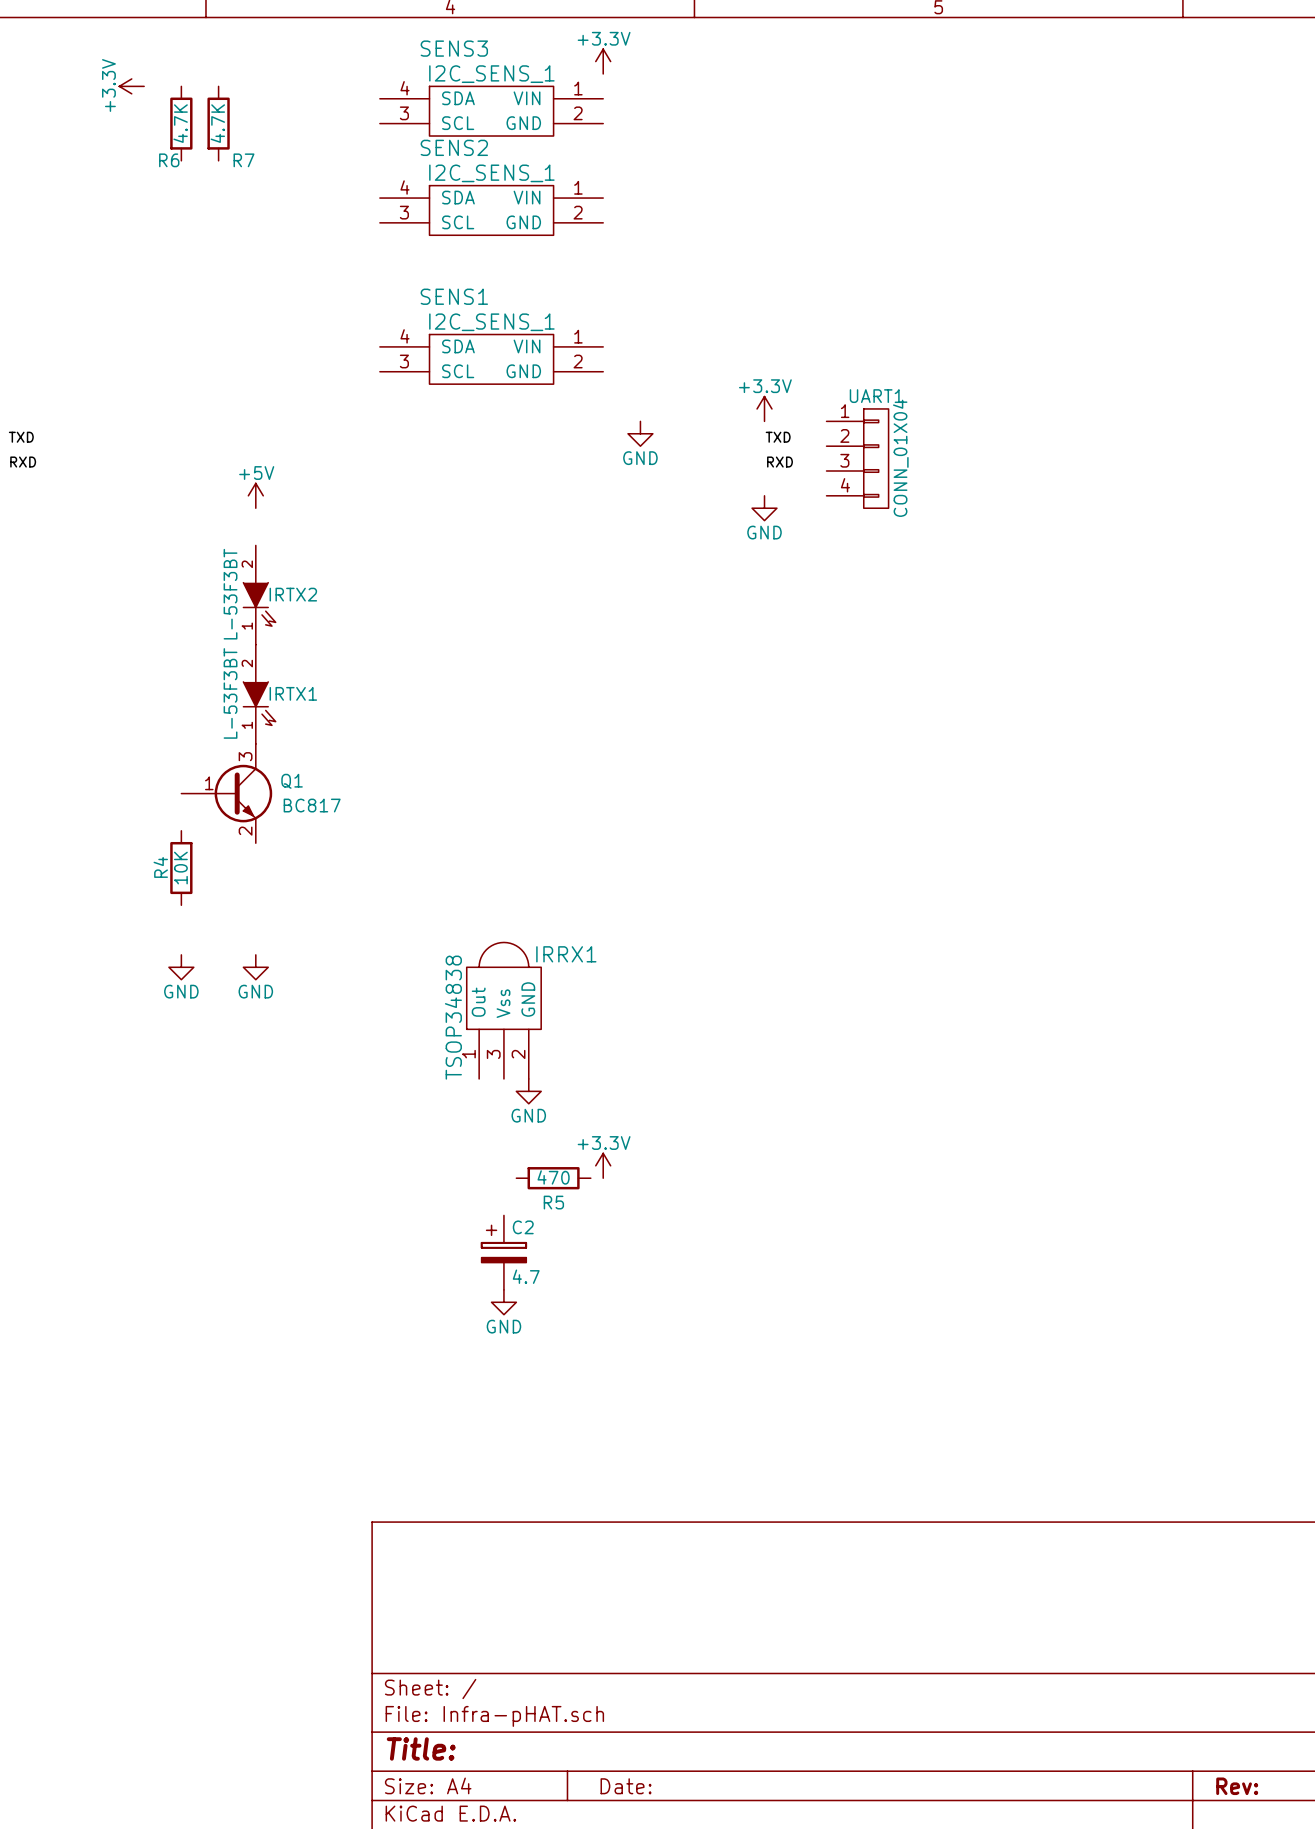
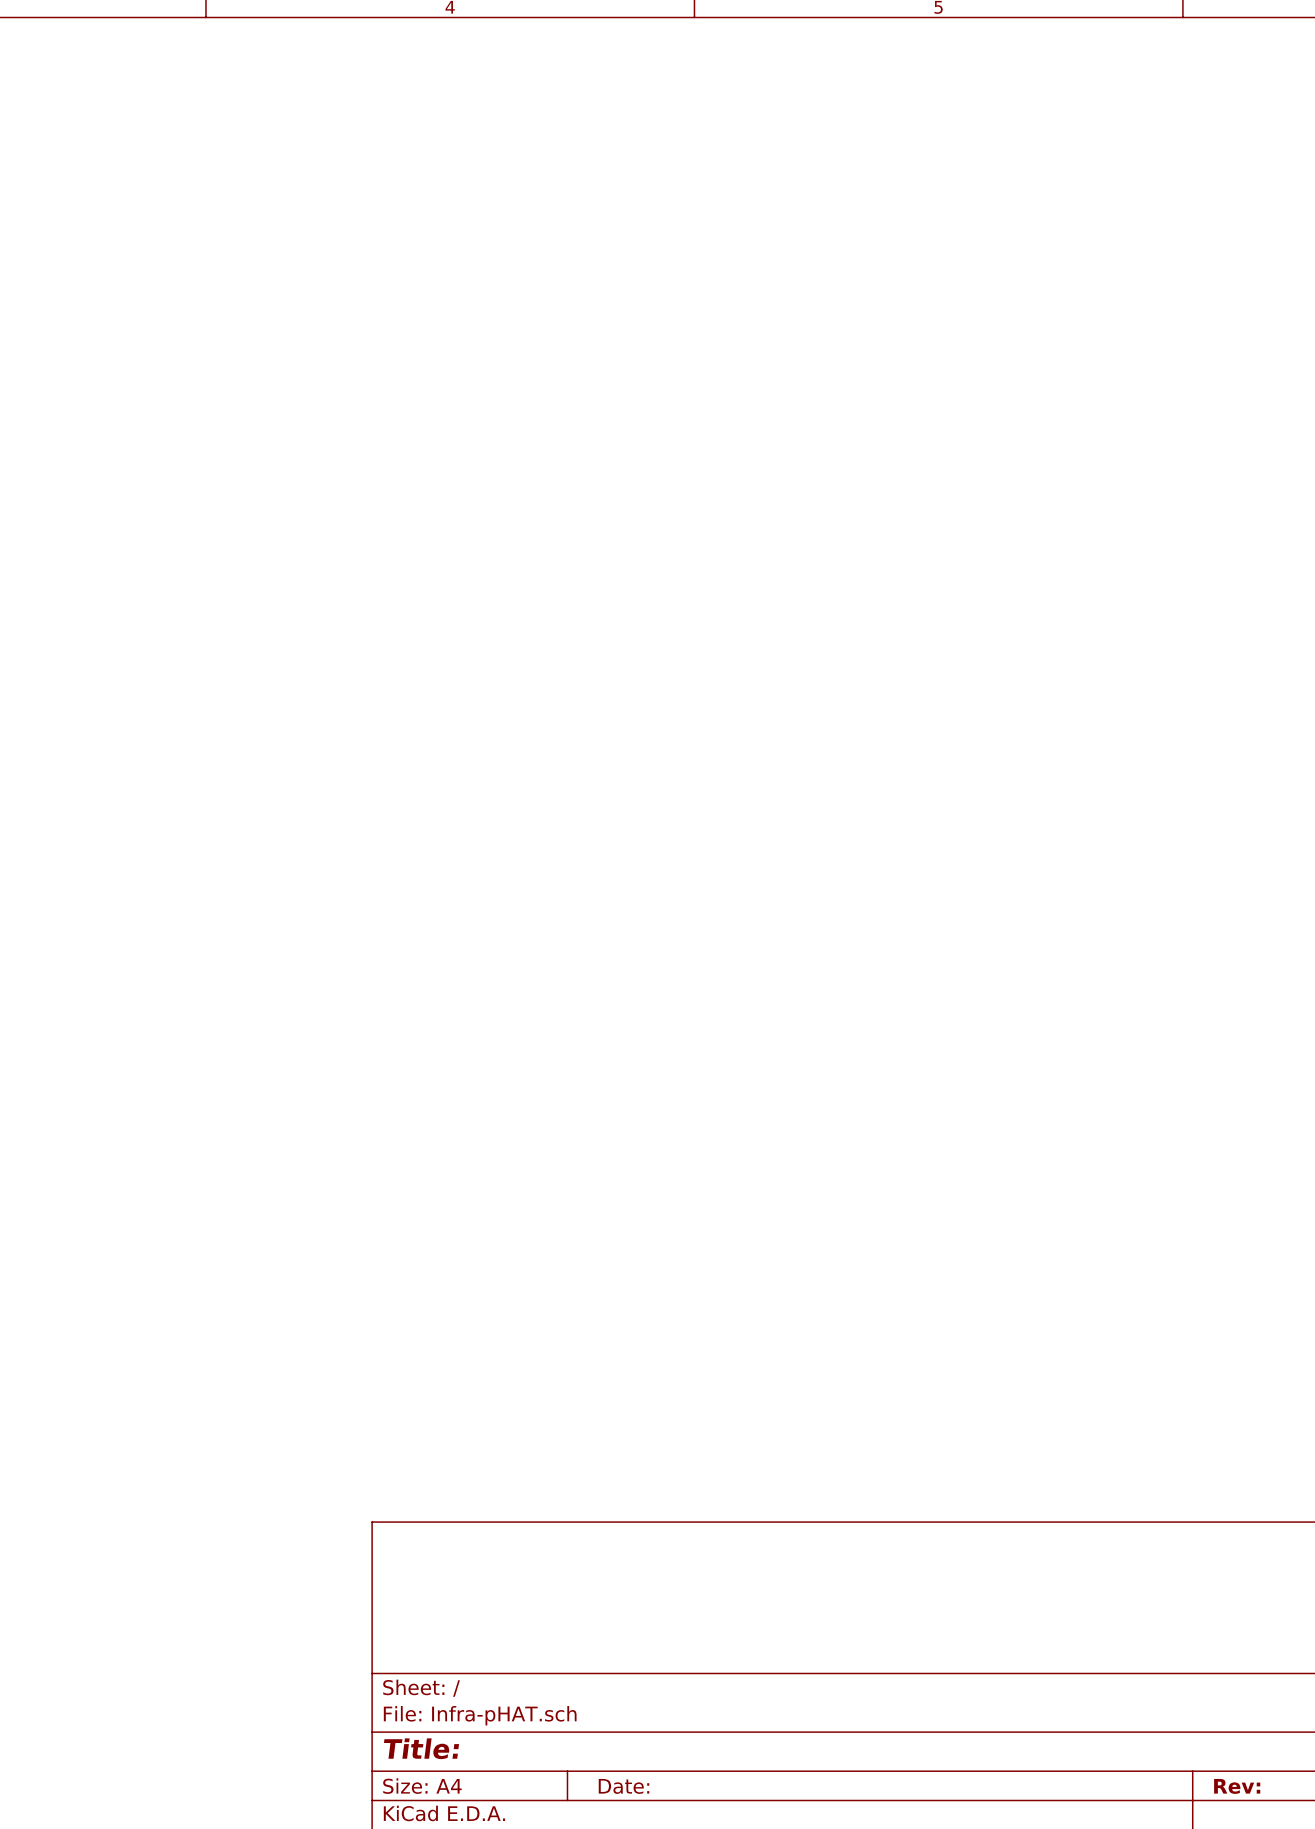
power symbol: +3.3V (603, 61) -> none
power symbol: +3.3V (131, 86) -> none
SENS3: I2C_SENS_1 (491, 111) -> none
R6: 4.7K (181, 123) -> none
R7: 4.7K (218, 123) -> none
SENS2: I2C_SENS_1 (491, 210) -> none
SENS1: I2C_SENS_1 (491, 359) -> none
power symbol: +3.3V (764, 408) -> none
power symbol: GND (640, 433) -> none
label: TXD (21, 437) -> none
label: TXD (778, 437) -> none
UART1: CONN_01X04 (857, 458) -> none
label: RXD (23, 462) -> none
label: RXD (780, 462) -> none
power symbol: +5V (255, 495) -> none
power symbol: GND (764, 508) -> none
IRTX2: L-53F3BT (259, 595) -> none
IRTX1: L-53F3BT (259, 694) -> none
Q1: BC817 (226, 793) -> none
R4: 10K (181, 868) -> none
power symbol: GND (181, 967) -> none
power symbol: GND (255, 967) -> none
IRRX1: TSOP34838 (503, 1010) -> none
power symbol: GND (528, 1091) -> none
power symbol: +3.3V (603, 1165) -> none
R5: 470 (553, 1178) -> none
C2: 4.7 (503, 1252) -> none
power symbol: GND (503, 1302) -> none

